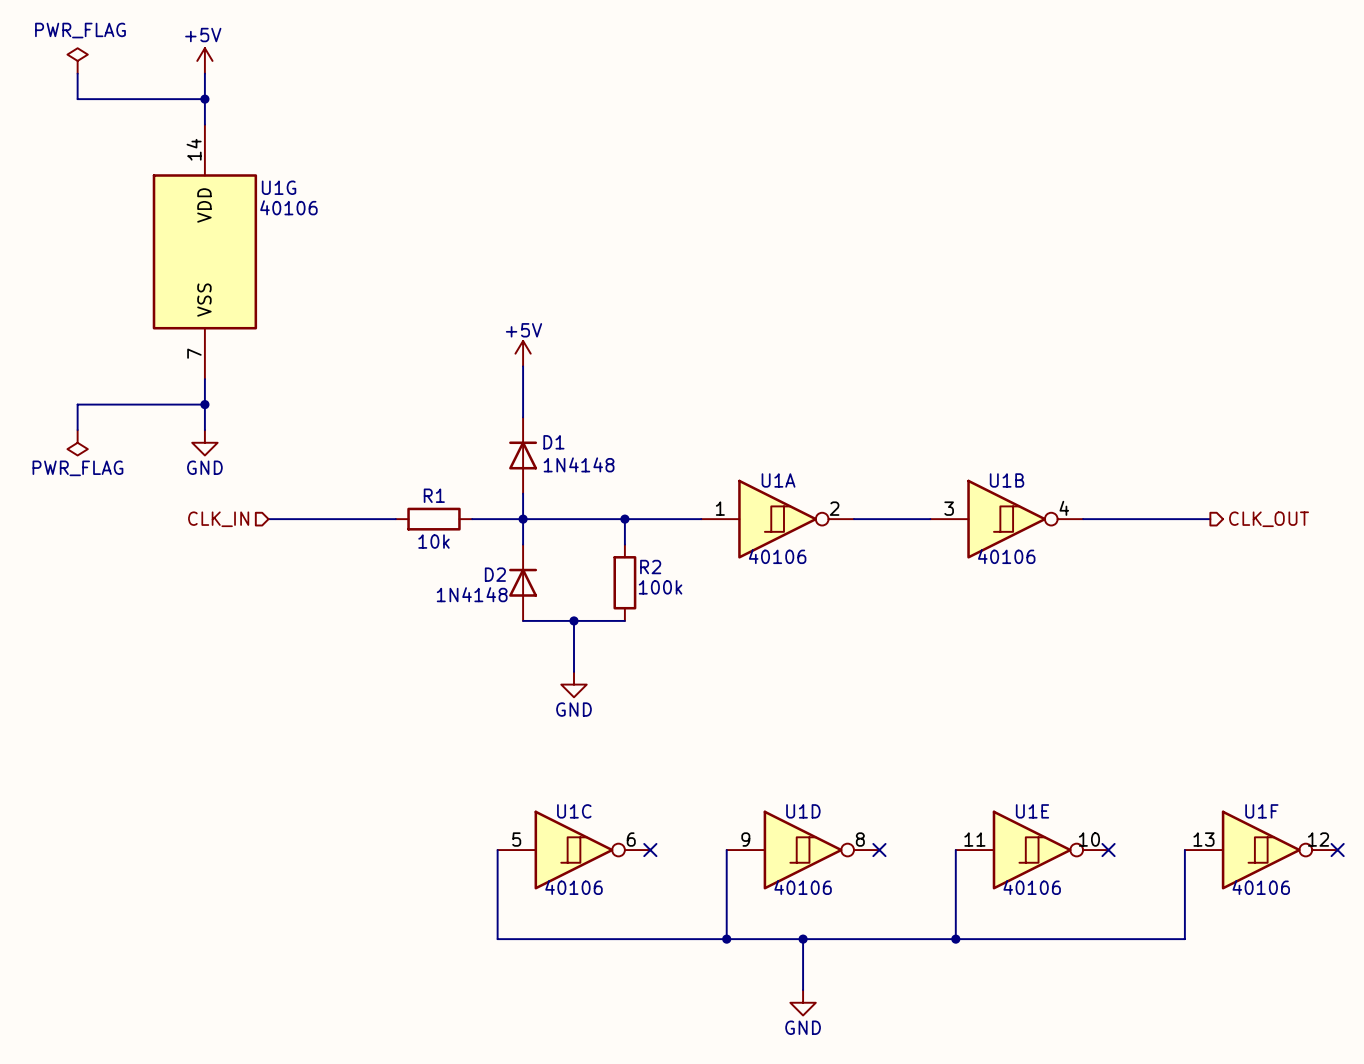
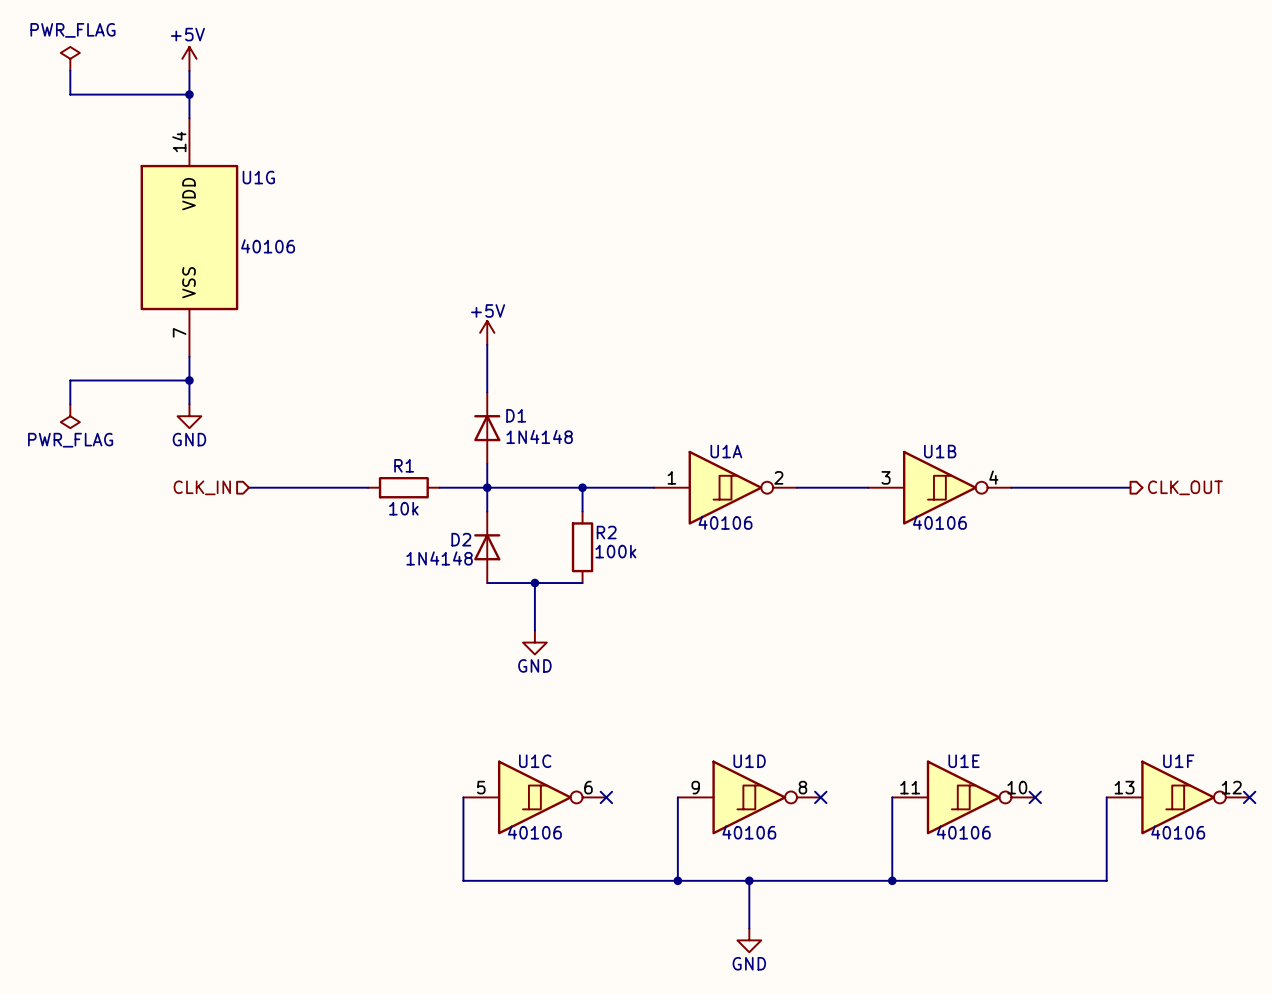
U1G value position: 40106 (288, 207) -> 40106 (268, 246)

